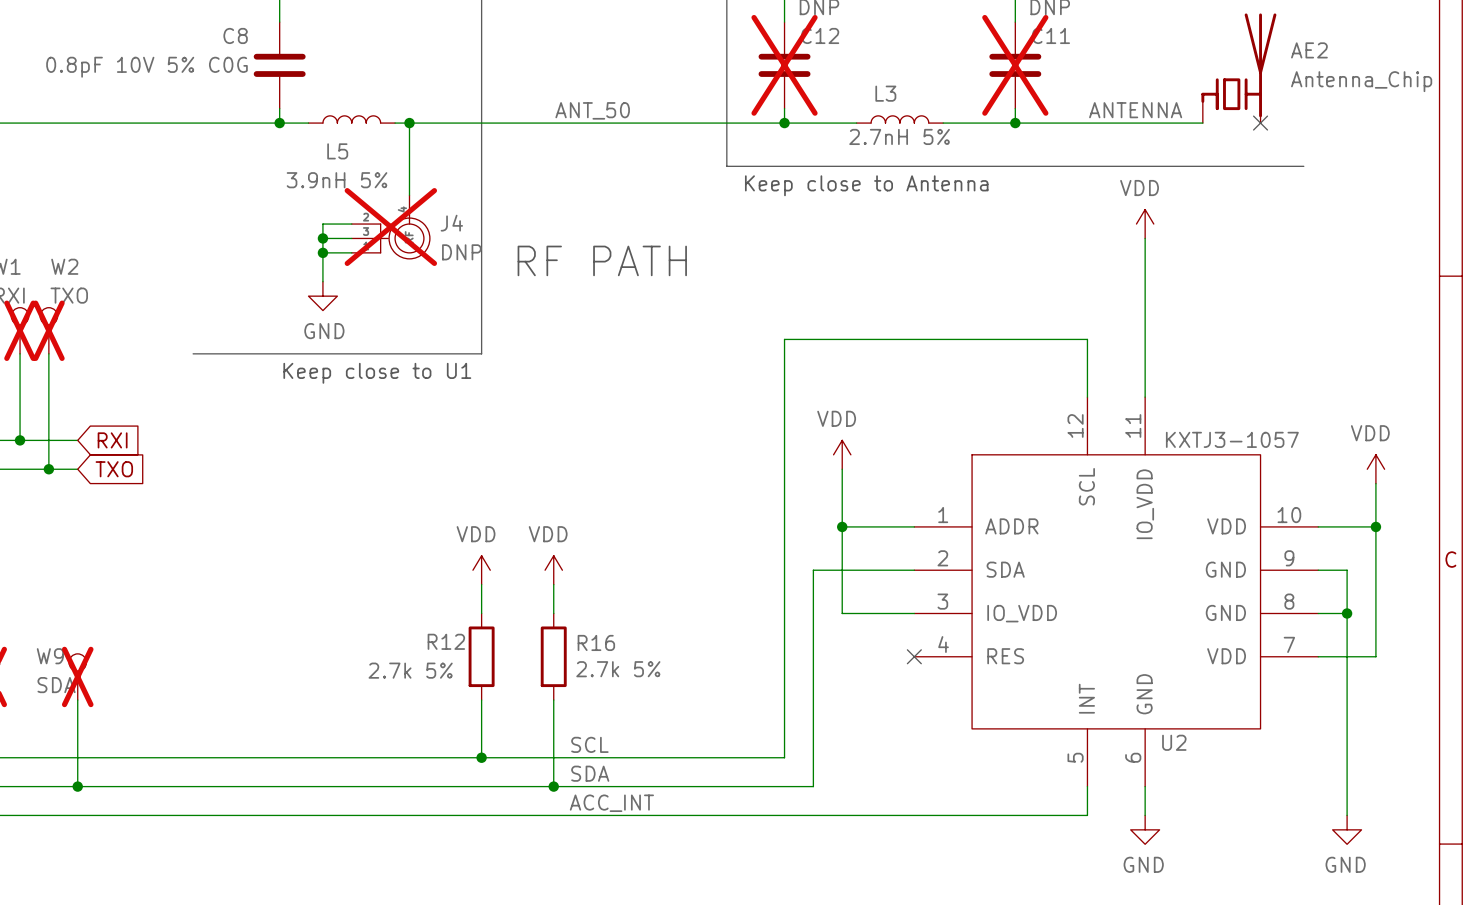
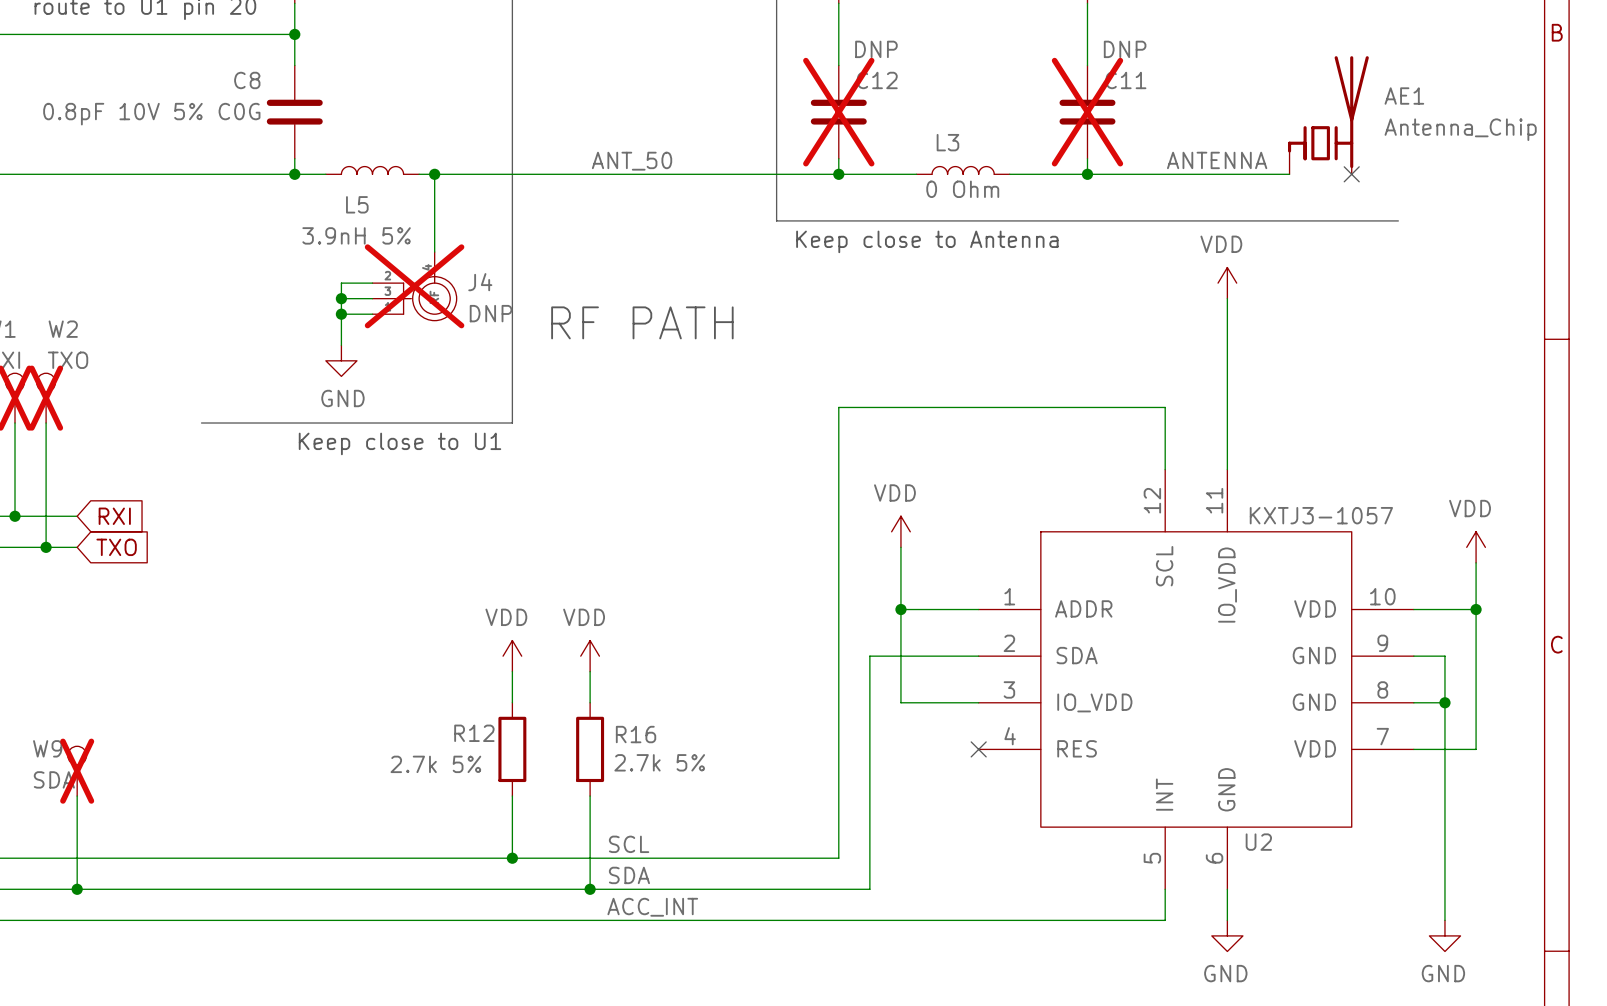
AE2 name: AE2 (1309, 50) -> AE1 (1404, 96)
L3 value: 2.7nH 5% (899, 136) -> 0 Ohm (962, 189)

